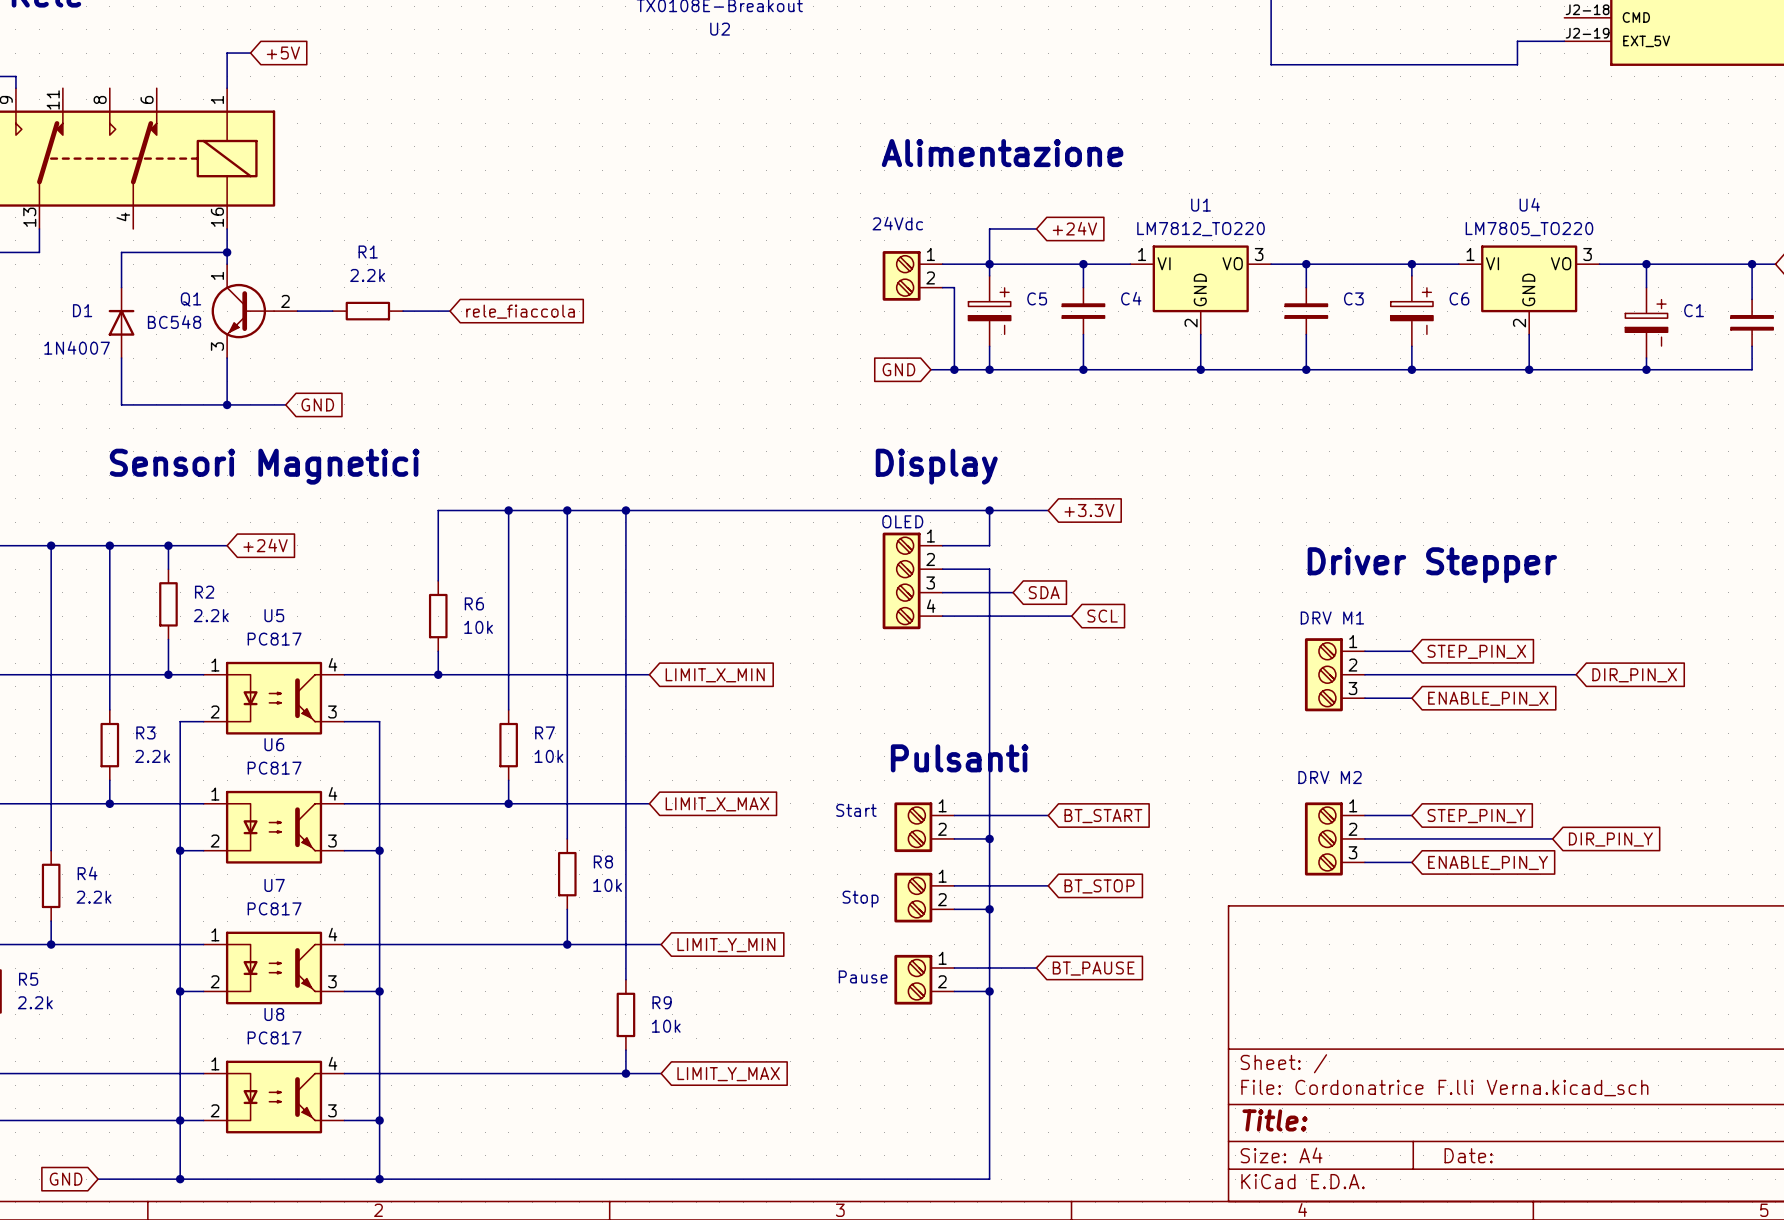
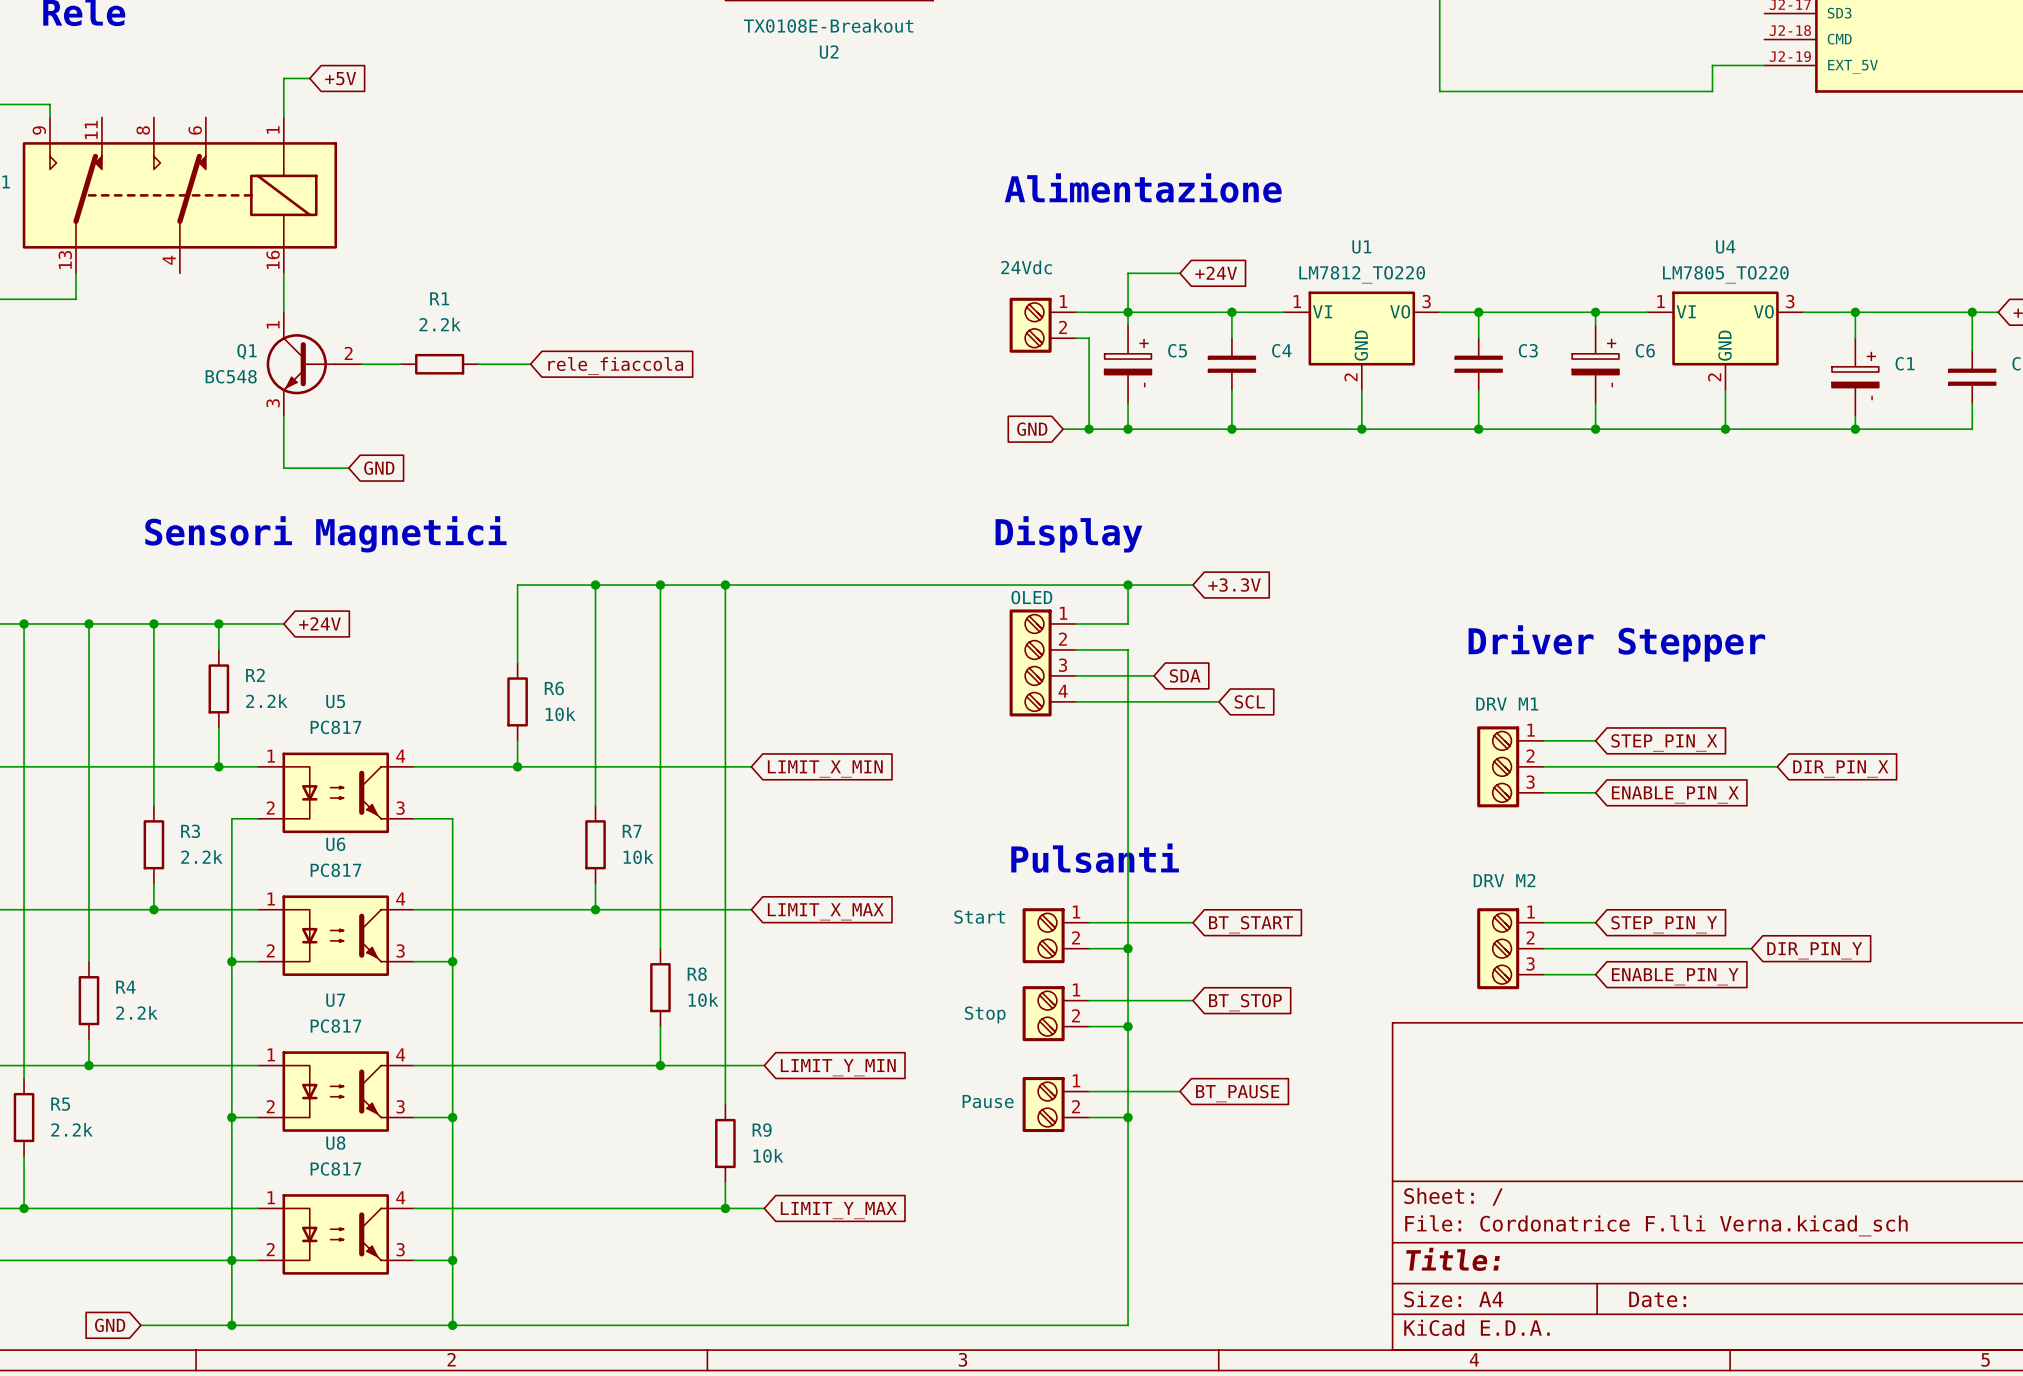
wire: (227, 252) (121, 252) (121, 287) -> none
junction: (227, 252) -> none
D1: 1N4007 (121, 322) -> none
wire: (121, 358) (121, 404) (227, 404) -> none
junction: (227, 404) -> none

